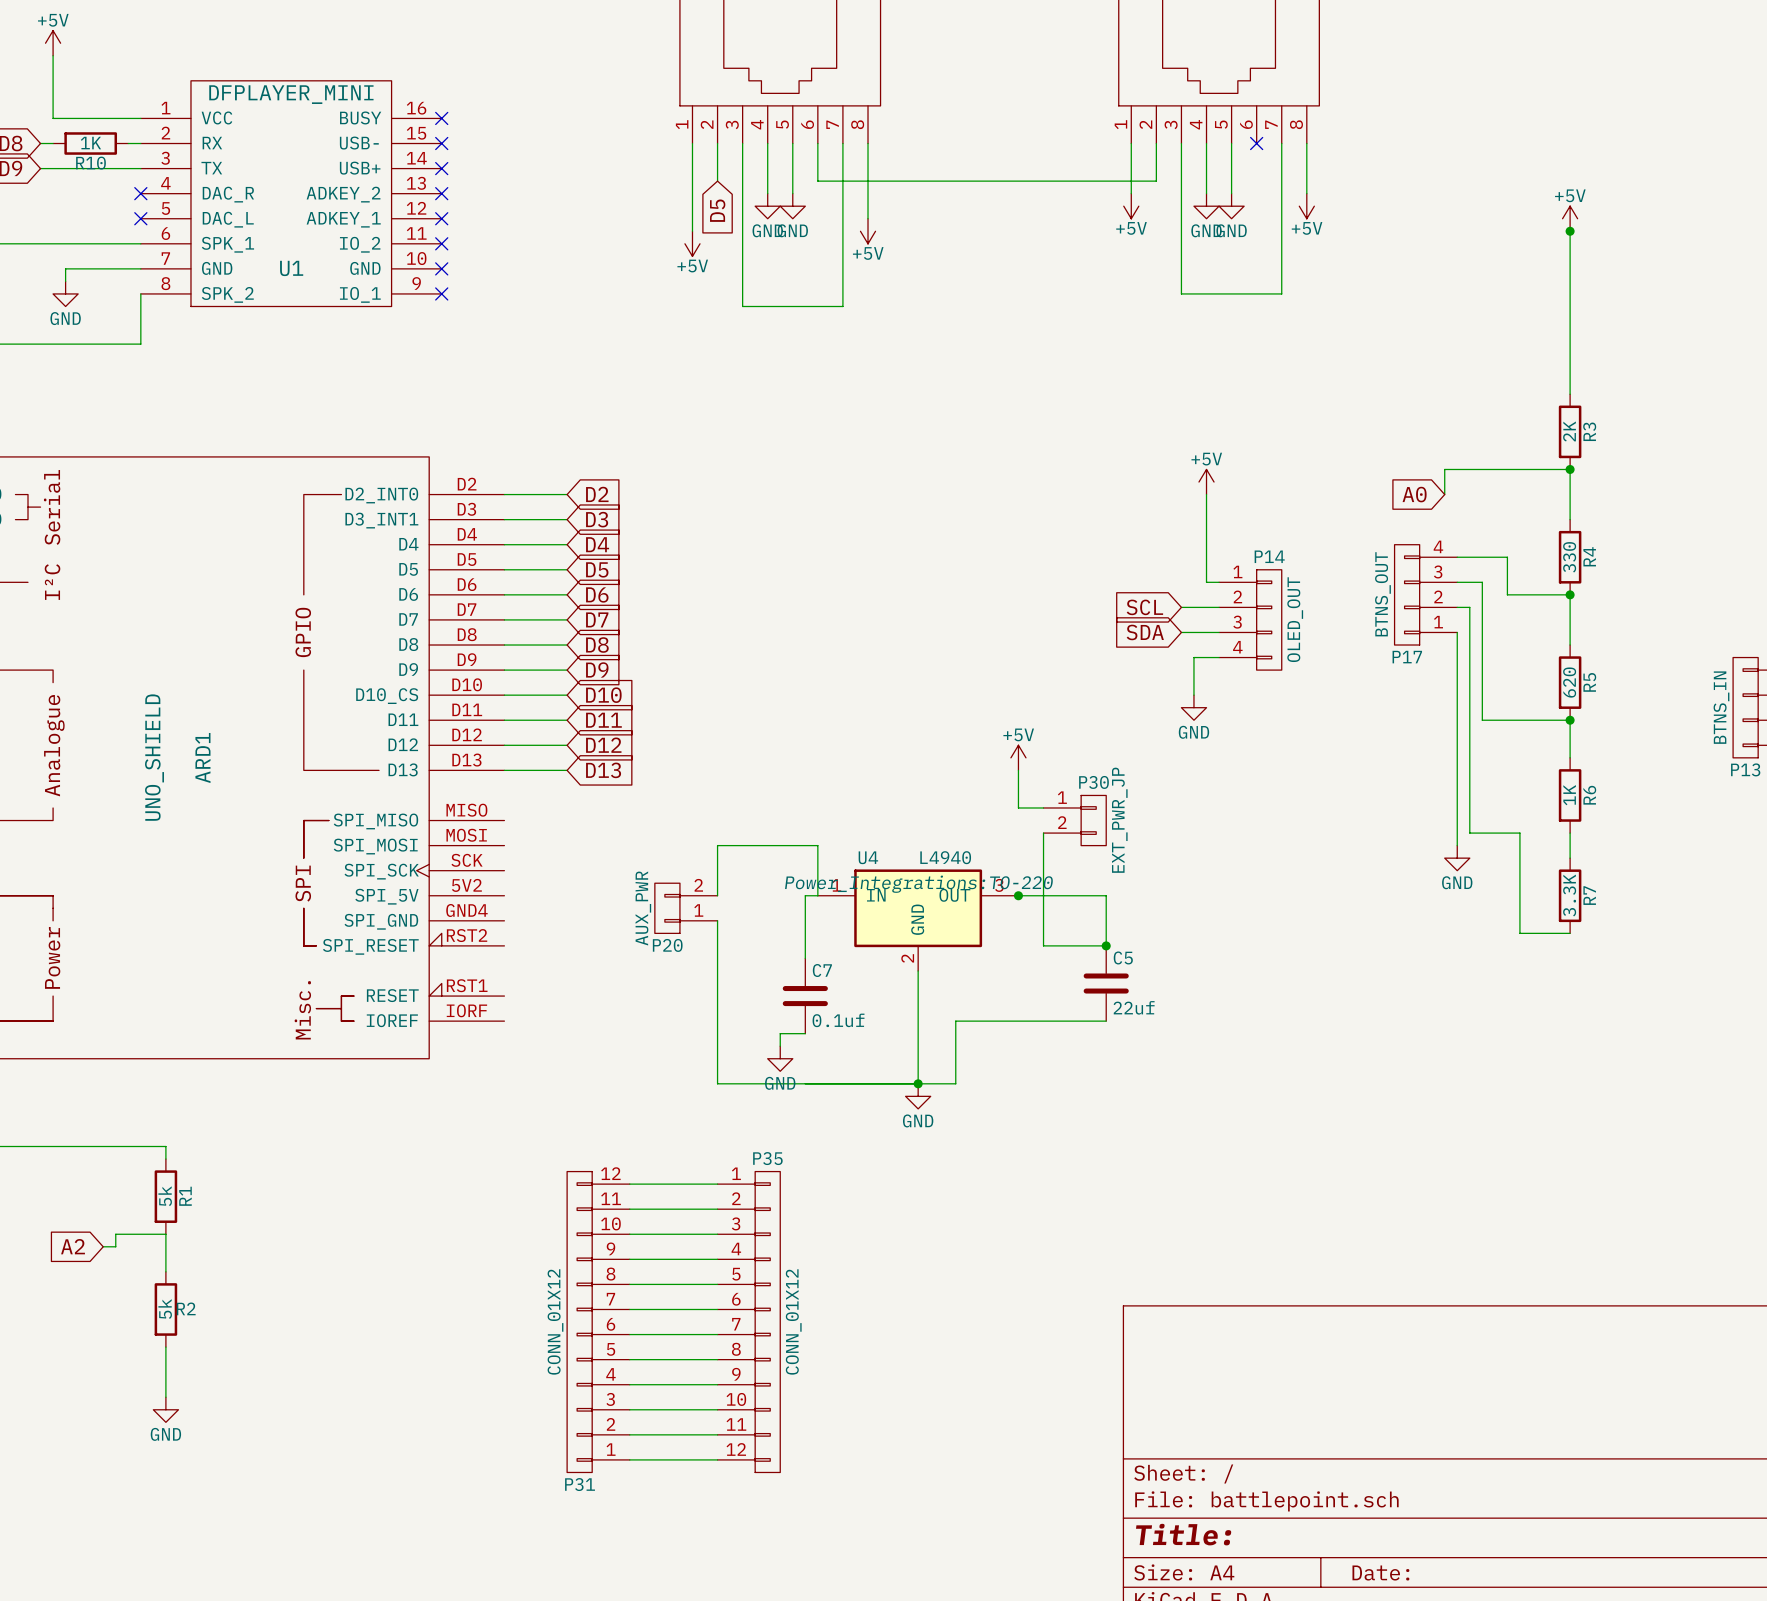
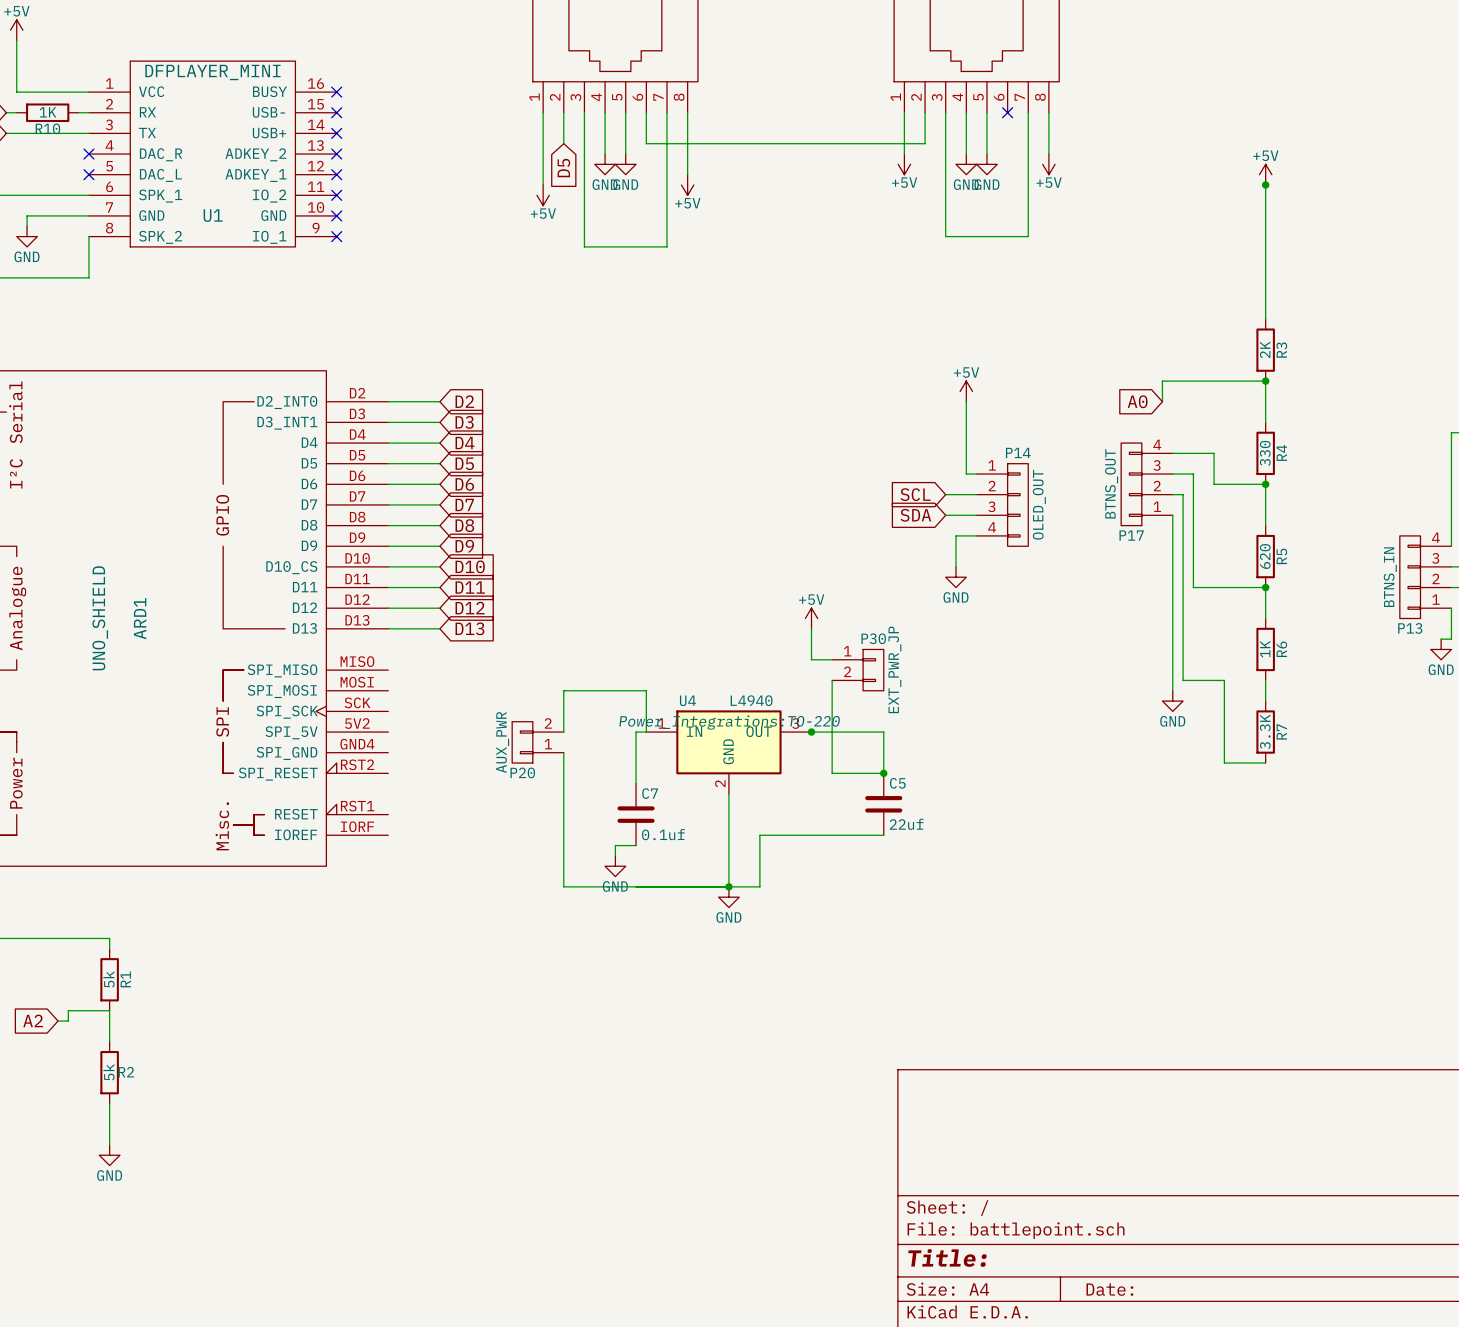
wire: (629, 1184) (717, 1184) -> none
wire: (629, 1209) (717, 1209) -> none
wire: (629, 1234) (717, 1234) -> none
wire: (629, 1259) (717, 1259) -> none
wire: (629, 1284) (717, 1284) -> none
wire: (629, 1309) (717, 1309) -> none
P31: CONN_01X12 (598, 1322) -> none
P35: CONN_01X12 (748, 1322) -> none
wire: (629, 1334) (717, 1334) -> none
wire: (629, 1359) (717, 1359) -> none
wire: (629, 1384) (717, 1384) -> none
wire: (629, 1409) (717, 1409) -> none
wire: (629, 1434) (717, 1434) -> none
wire: (629, 1459) (717, 1459) -> none

